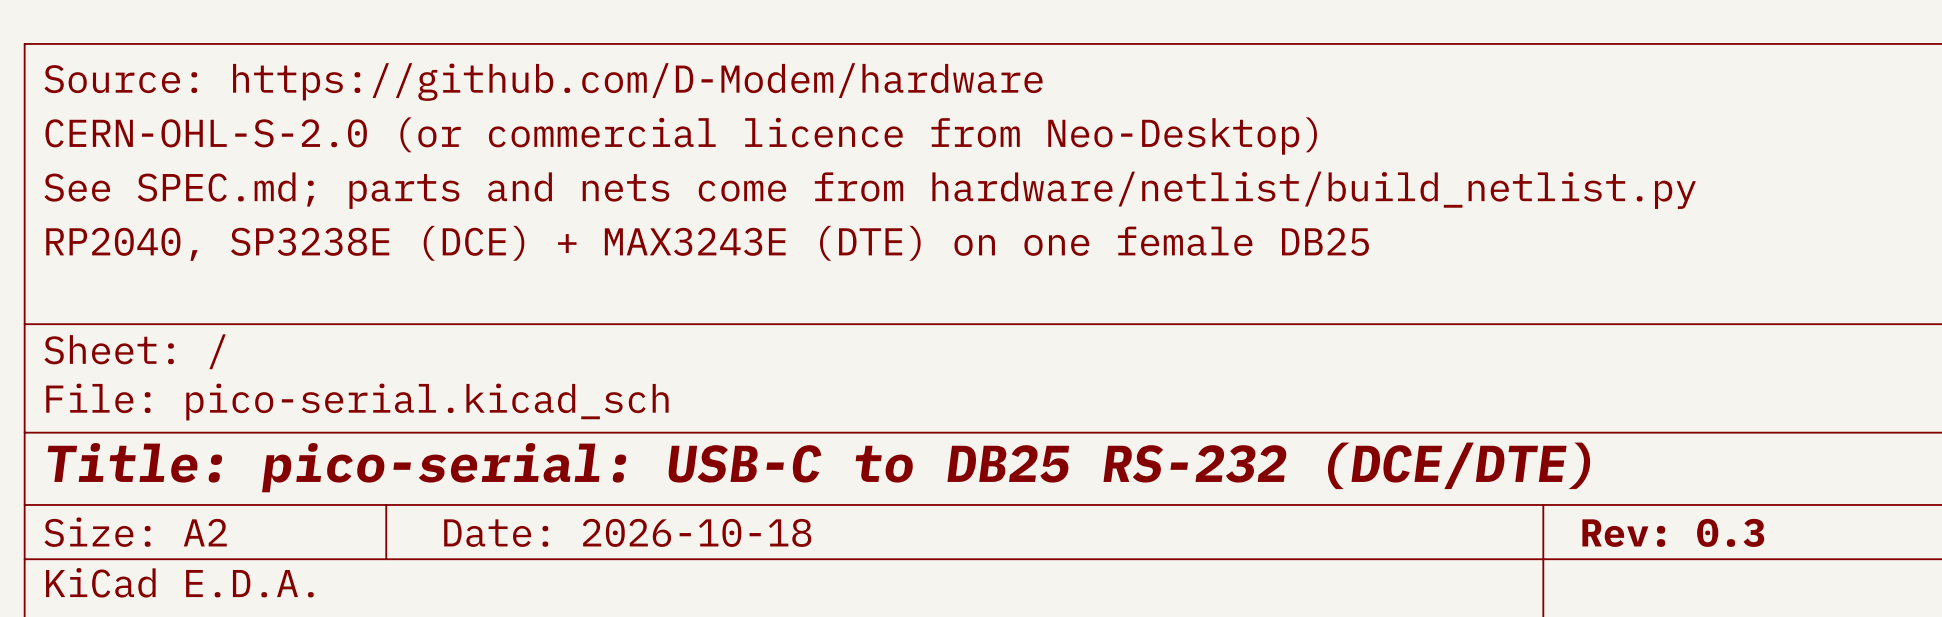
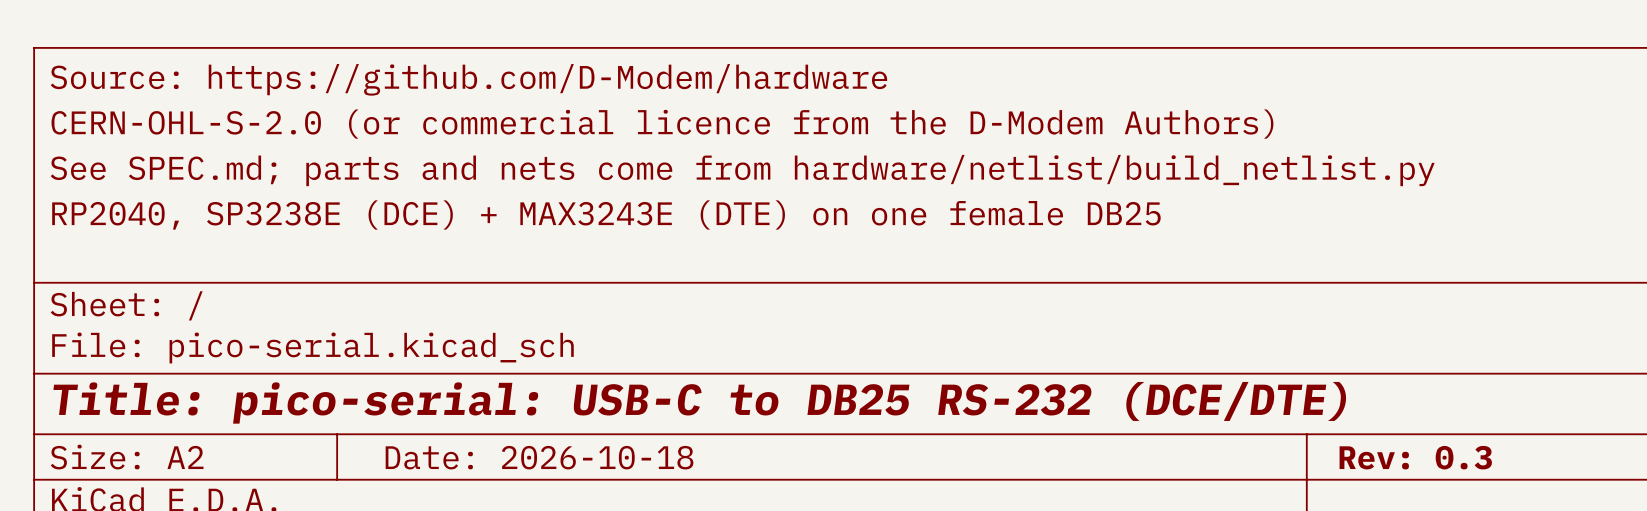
title block: CERN-OHL-S-2.0 (or commercial licence from Neo-Desktop) (681, 136) -> CERN-OHL-S-2.0 (or commercial licence from the D-Modem Authors) (662, 124)

